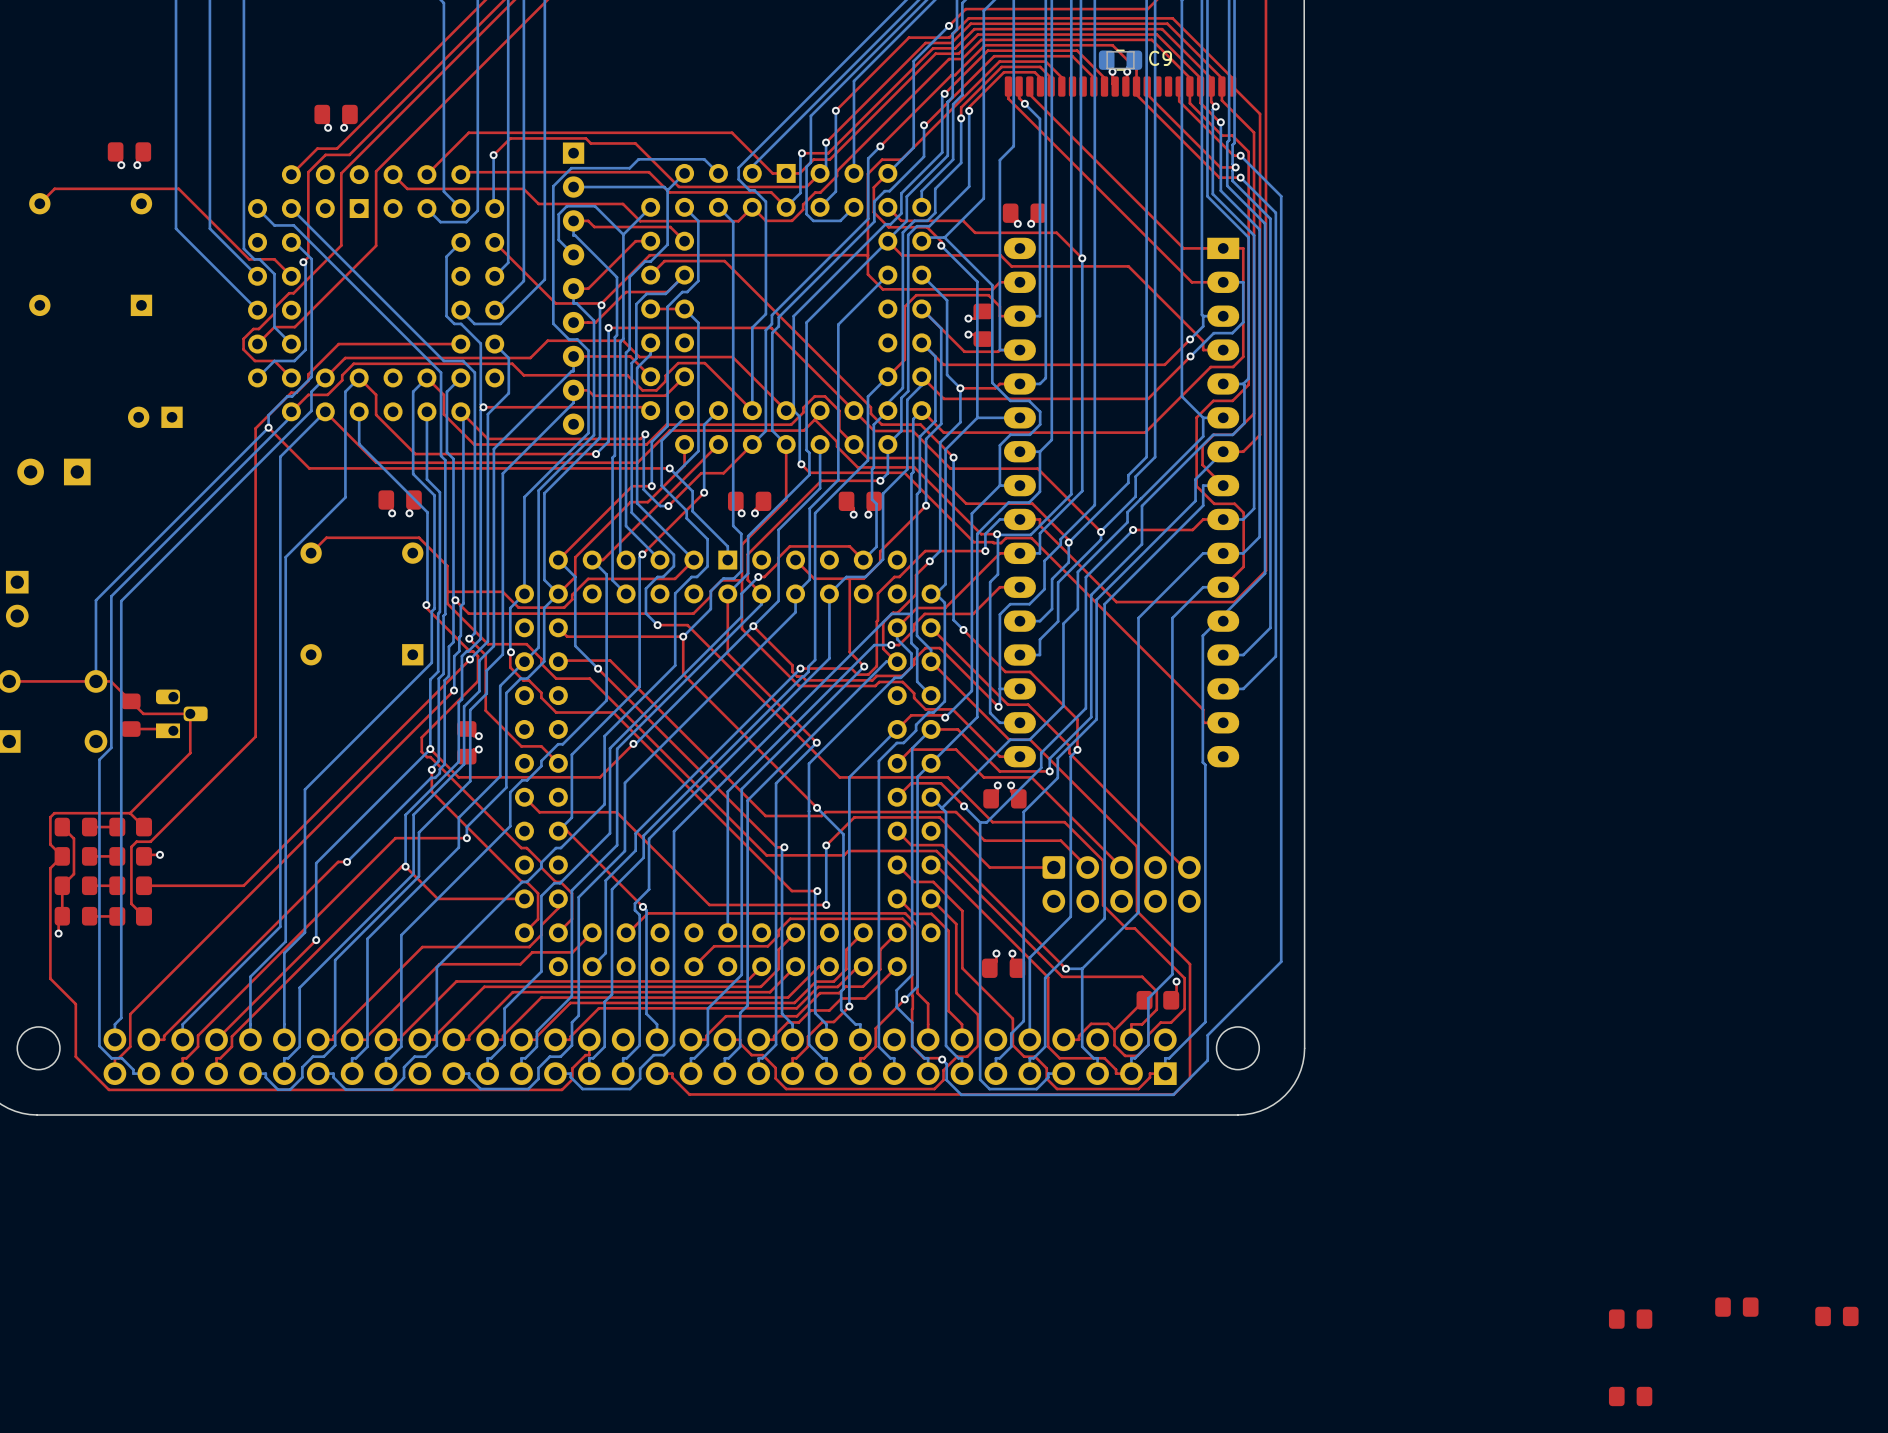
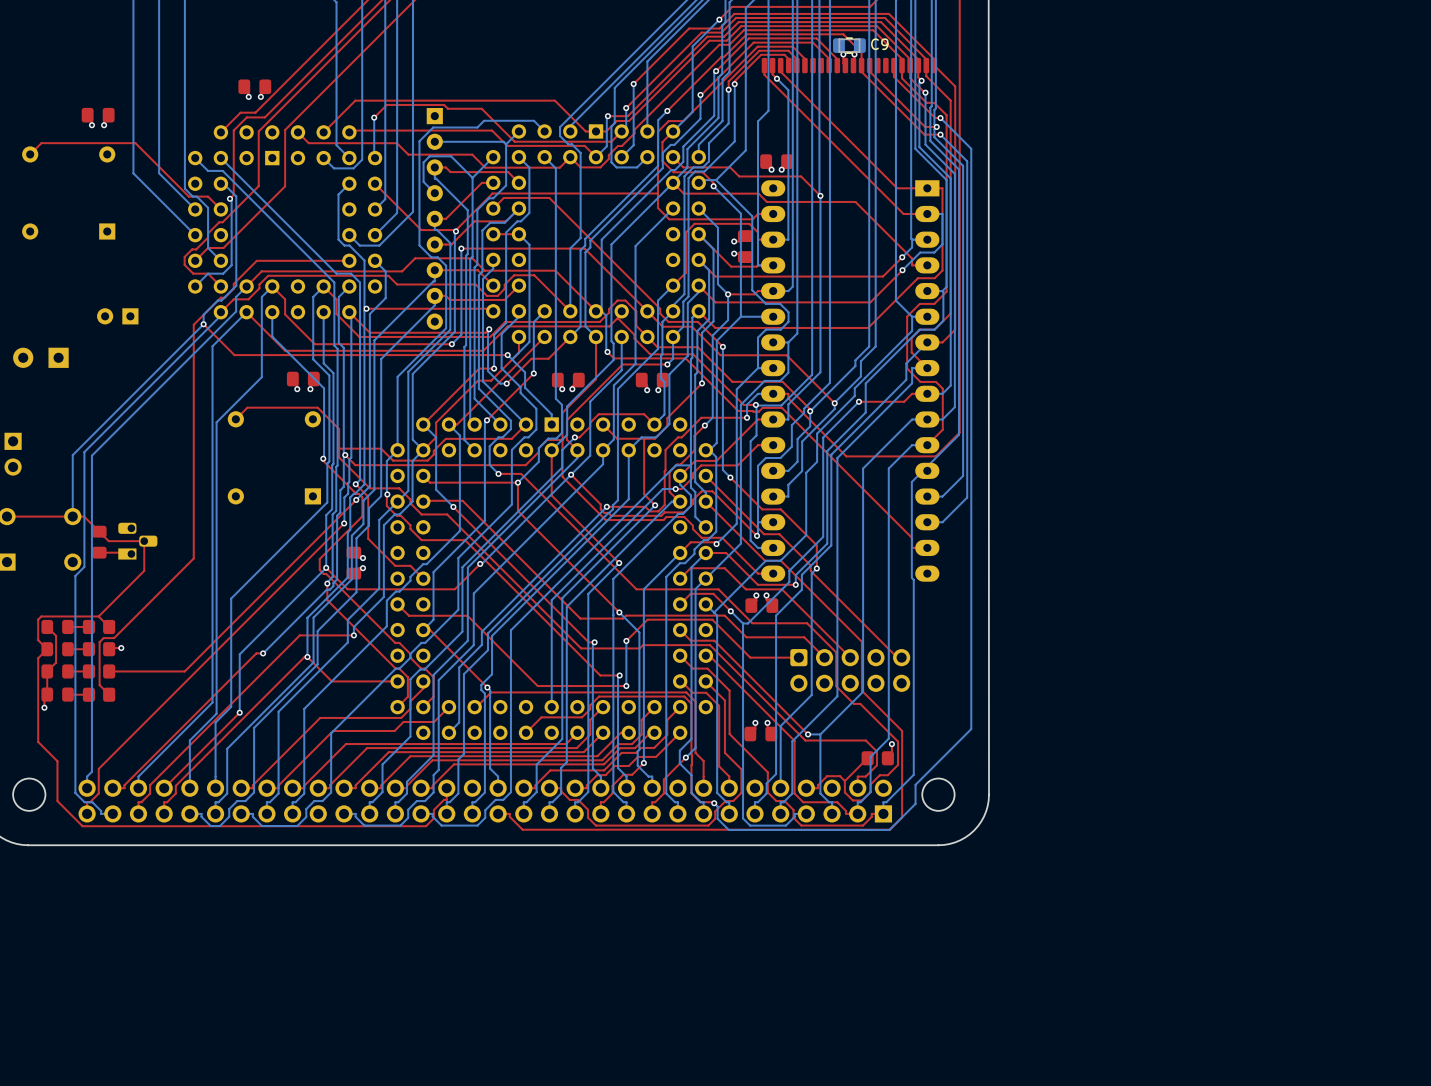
part: (1736, 1307) -> none
part: (1836, 1316) -> none
part: (1630, 1319) -> none
part: (1630, 1396) -> none

